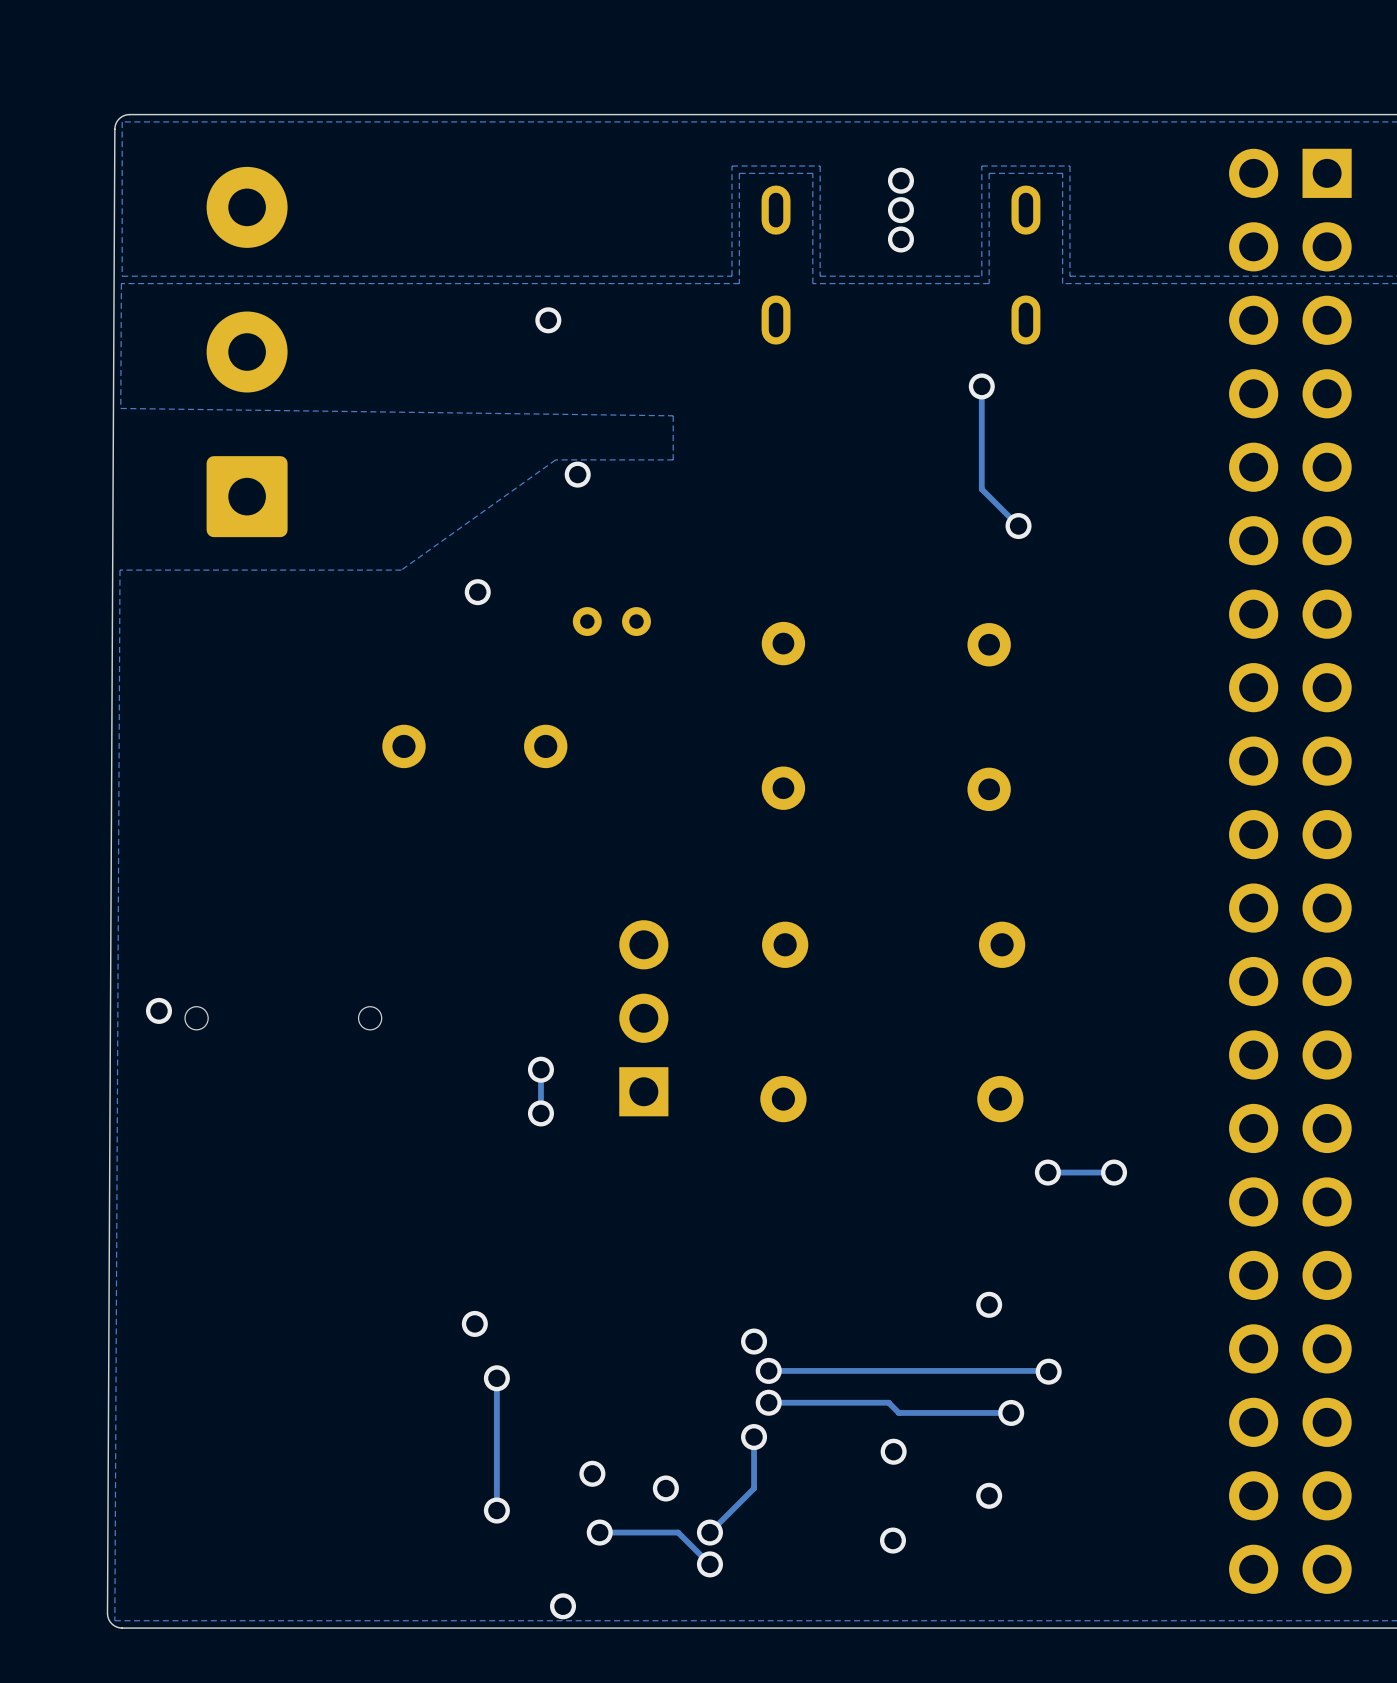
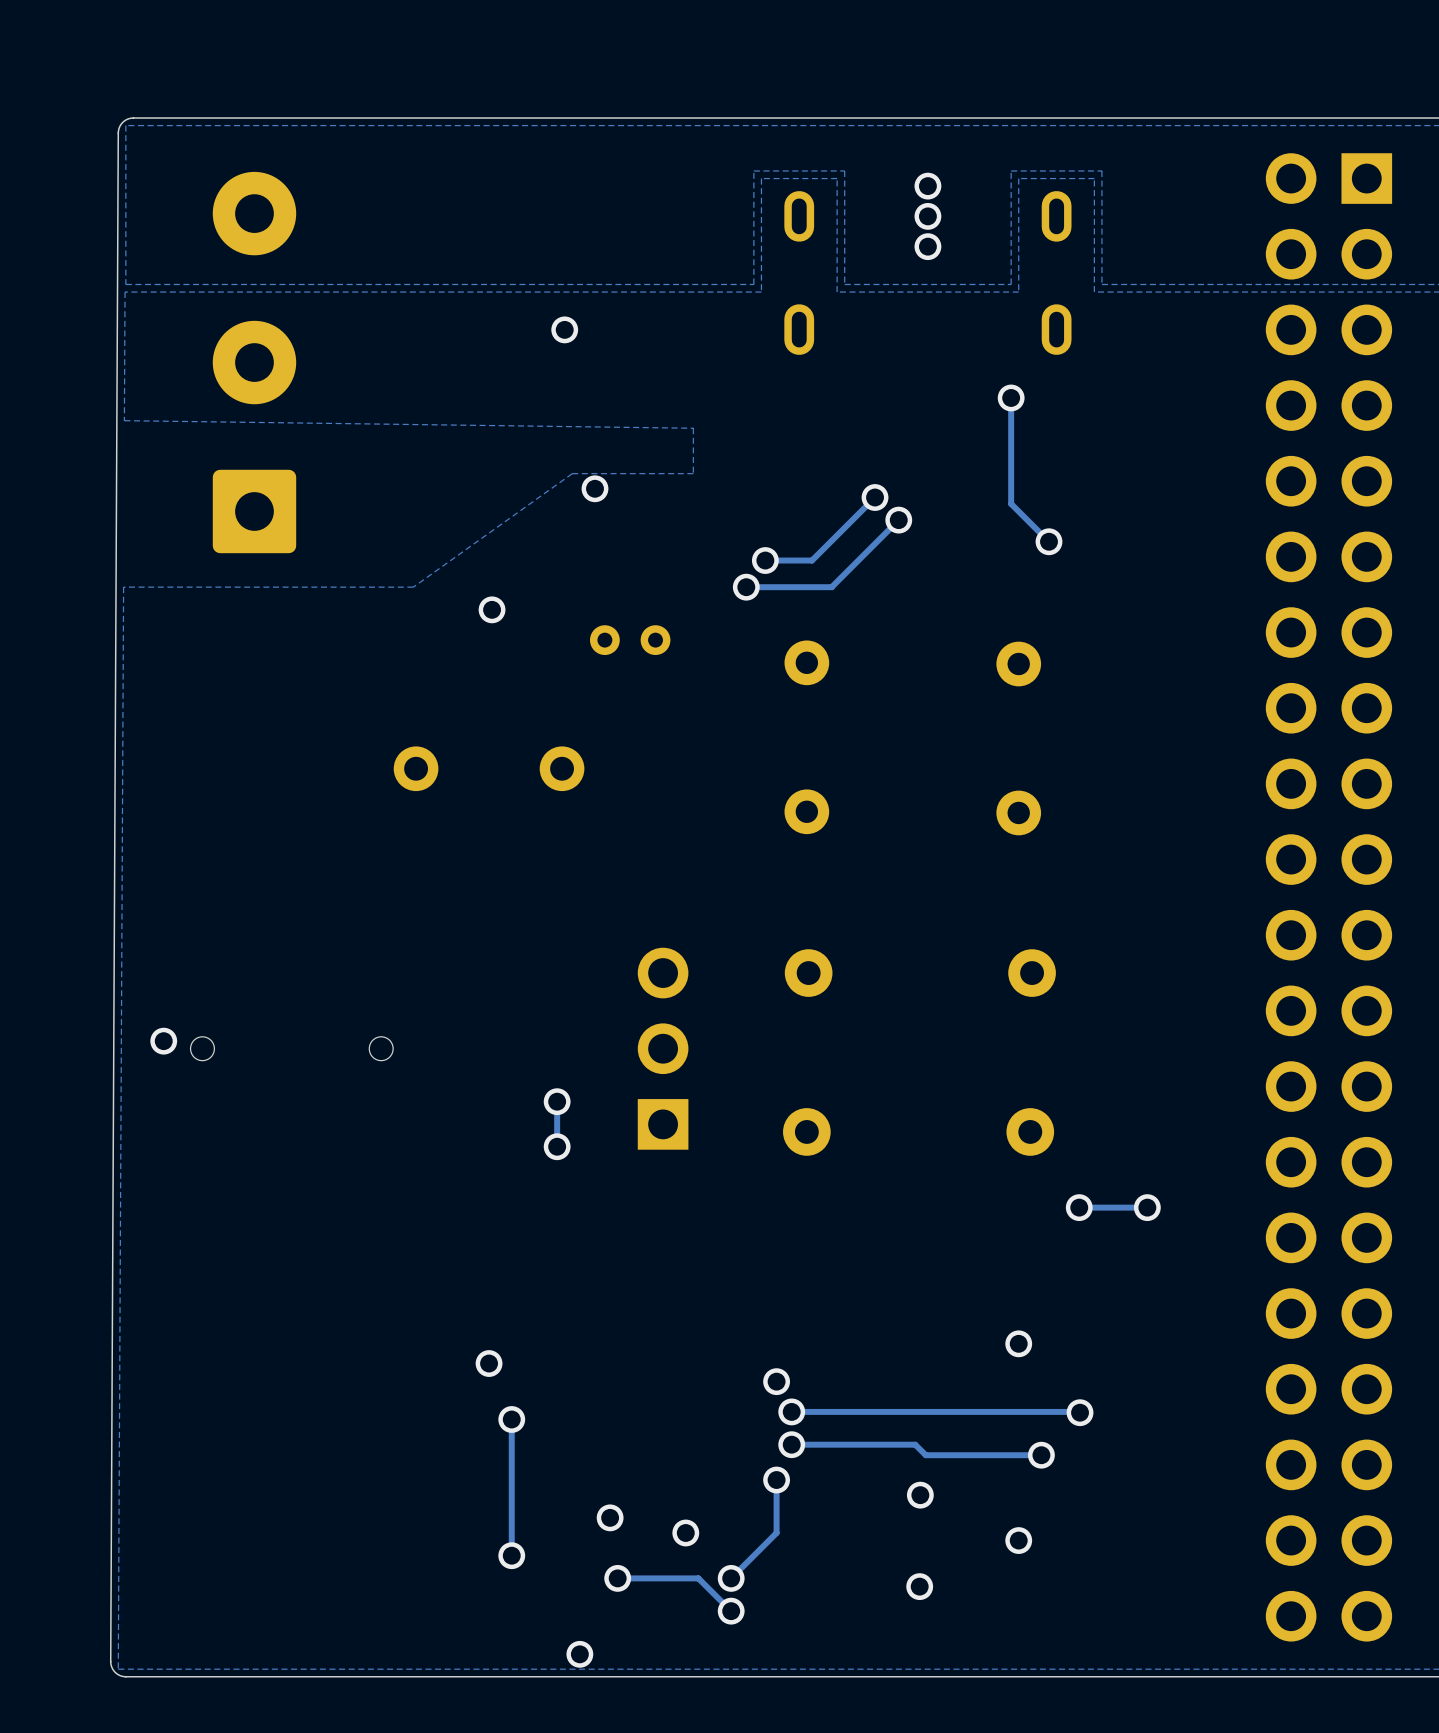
track: none -> (875, 497) (812, 560) (765, 560)
via: none -> (875, 497)
track: none -> (898, 520) (831, 587) (746, 587)
via: none -> (898, 520)
via: none -> (765, 560)
via: none -> (746, 587)

